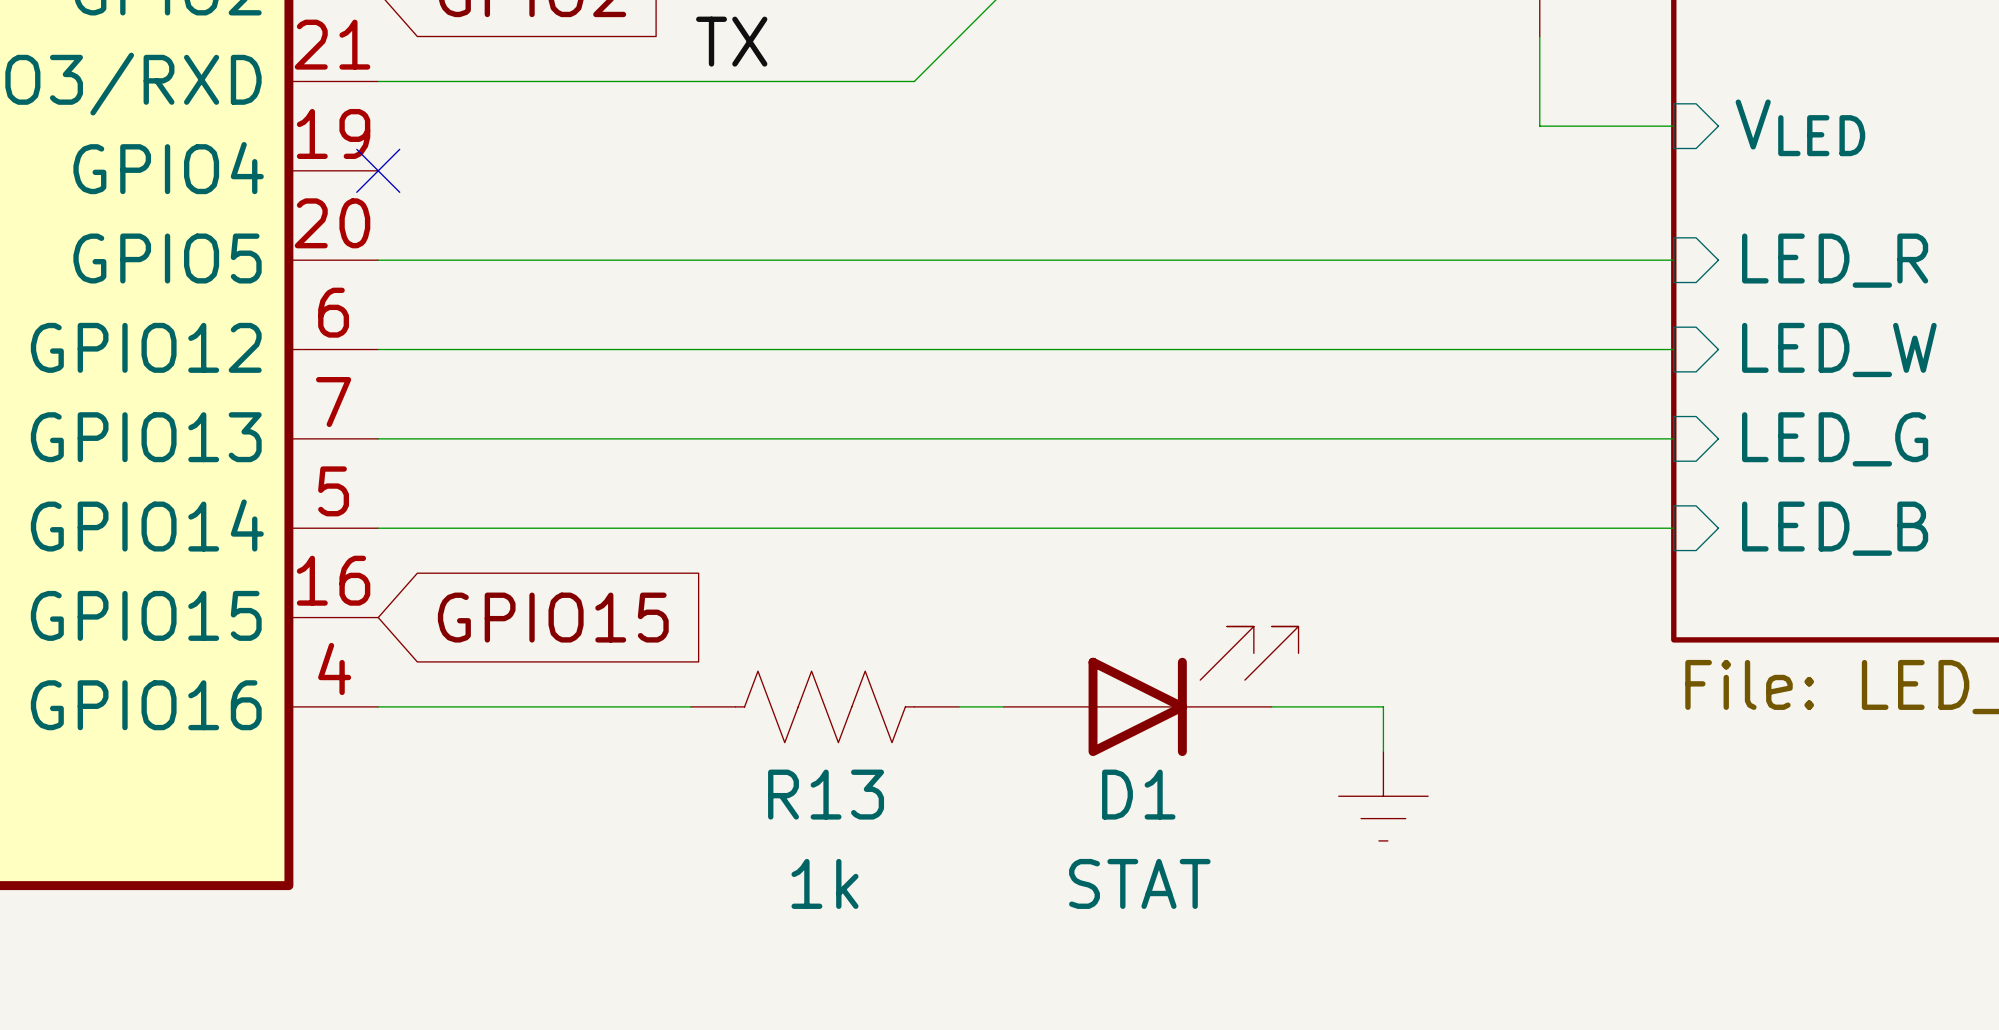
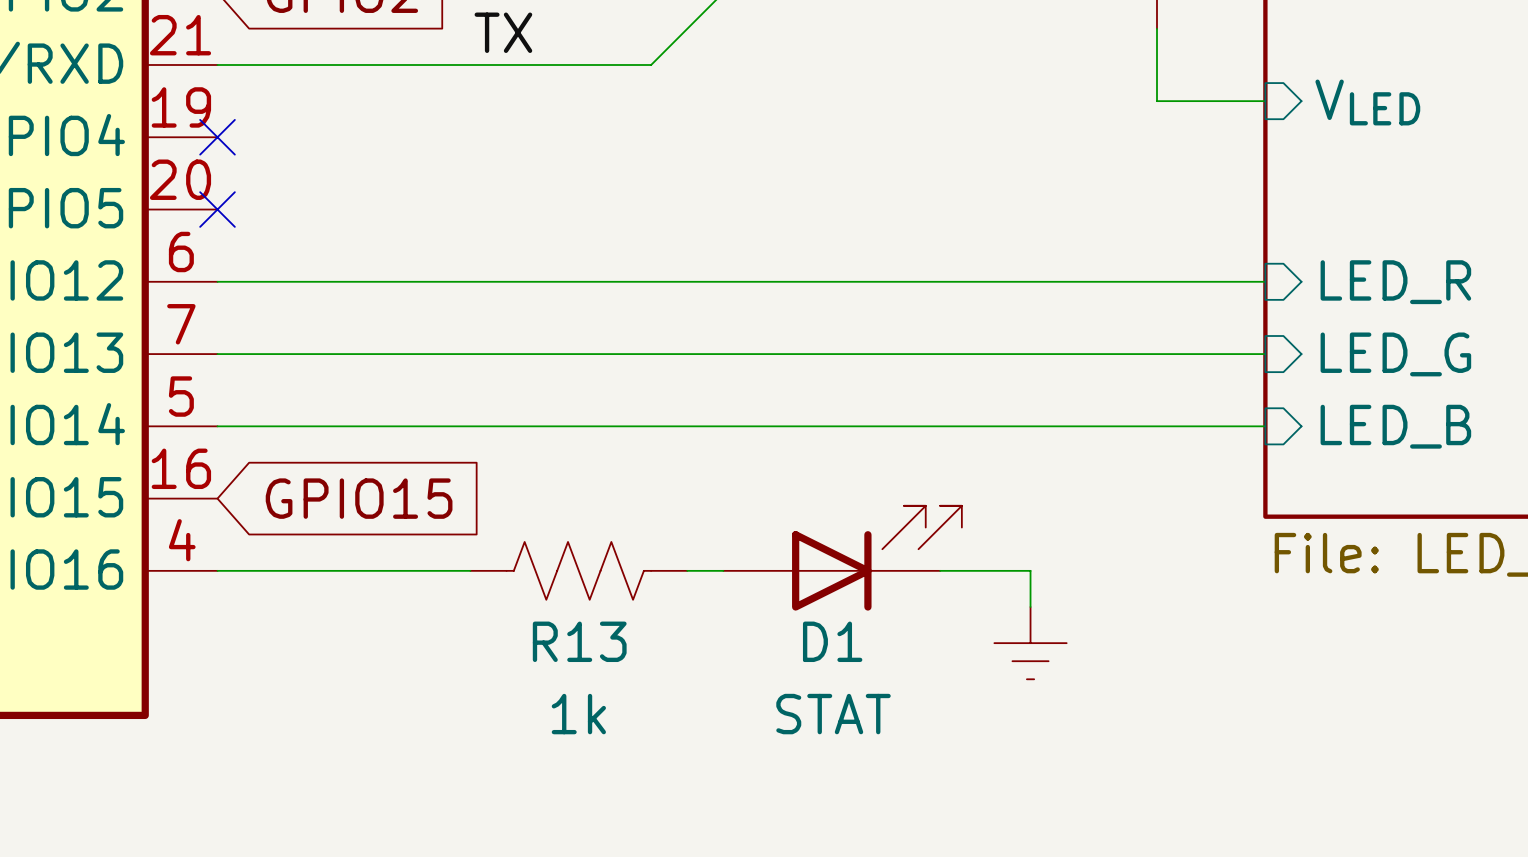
wire: (378, 260) (1673, 260) -> none
no-connect mark: none -> (217, 209)
sheet pin: LED_R (1835, 260) -> none
sheet pin: LED_W (1839, 349) -> LED_R (1395, 282)

